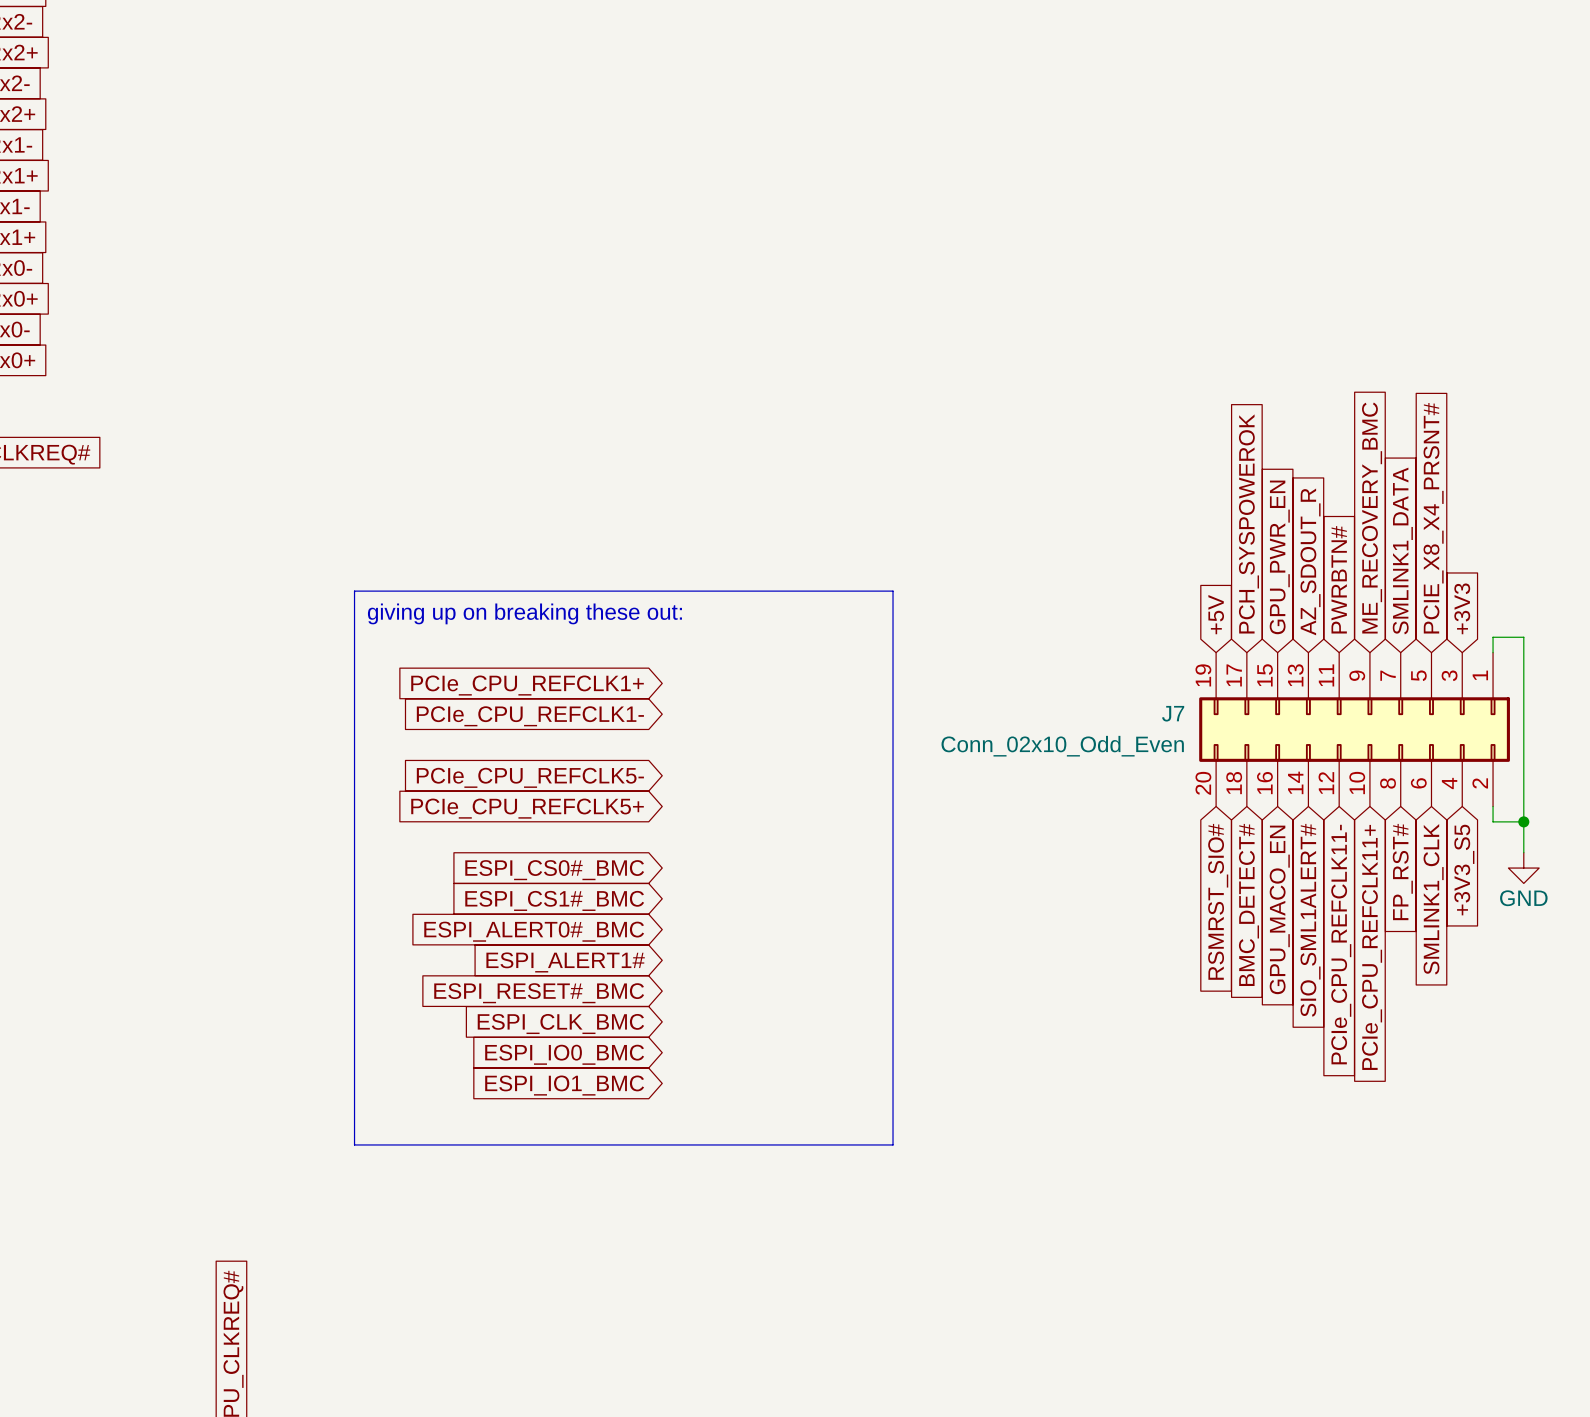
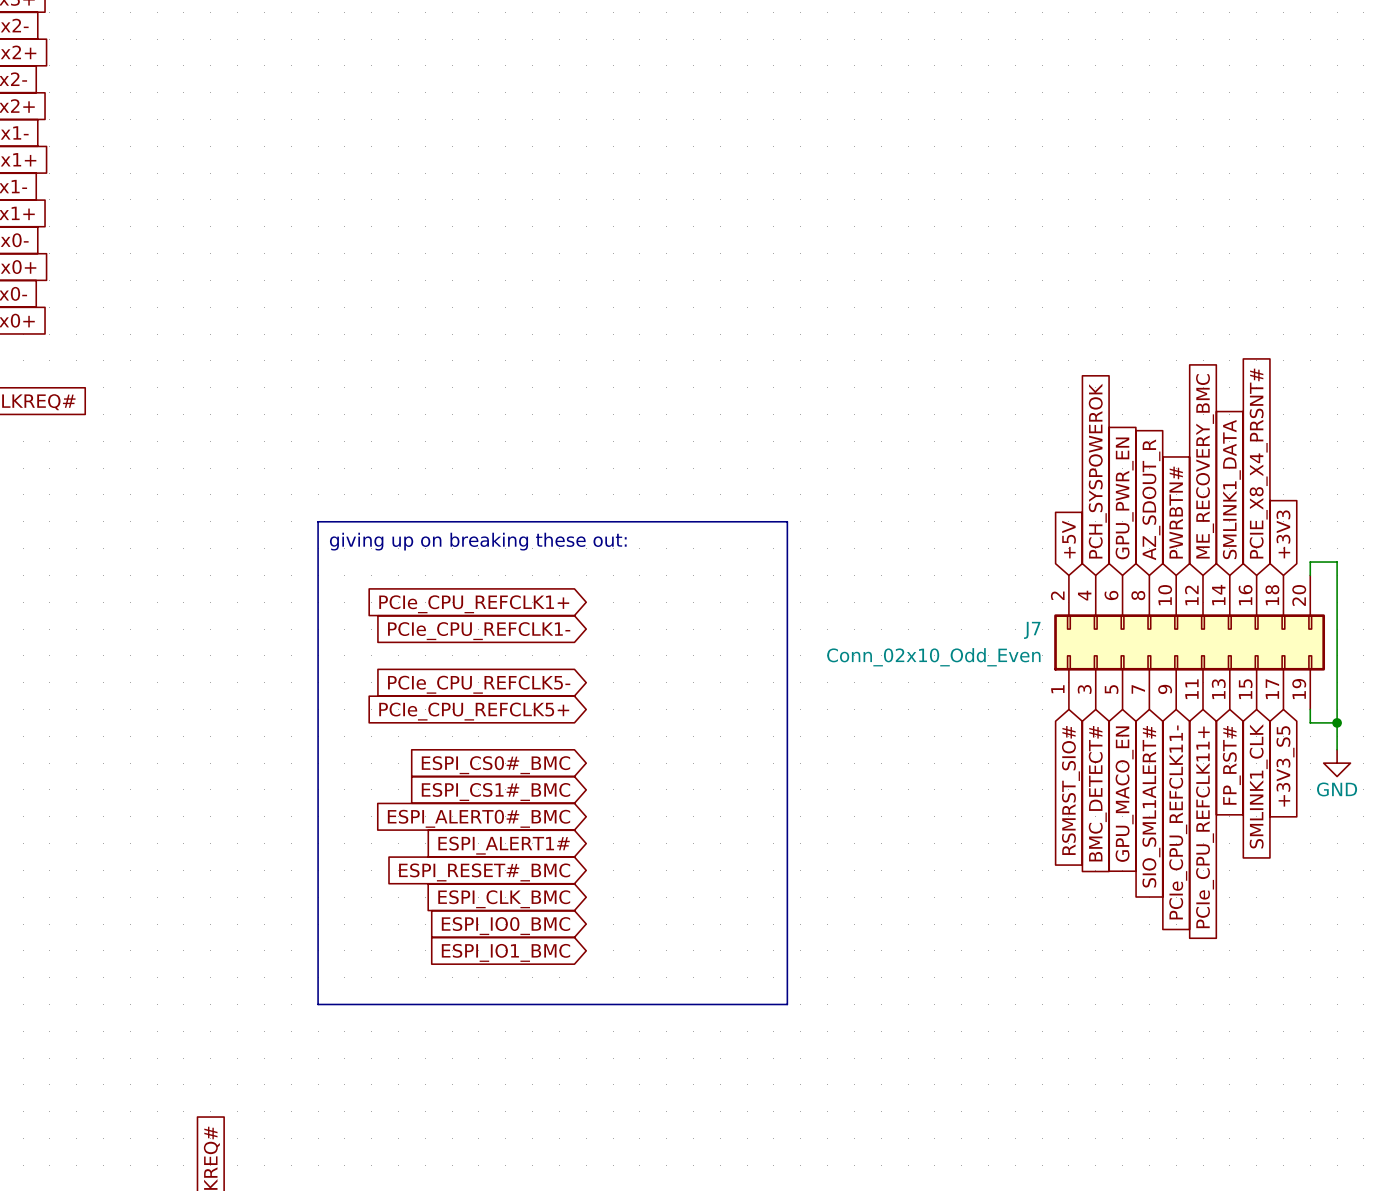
J7 rotation: 0° (1354, 729) -> 180° (1189, 642)

